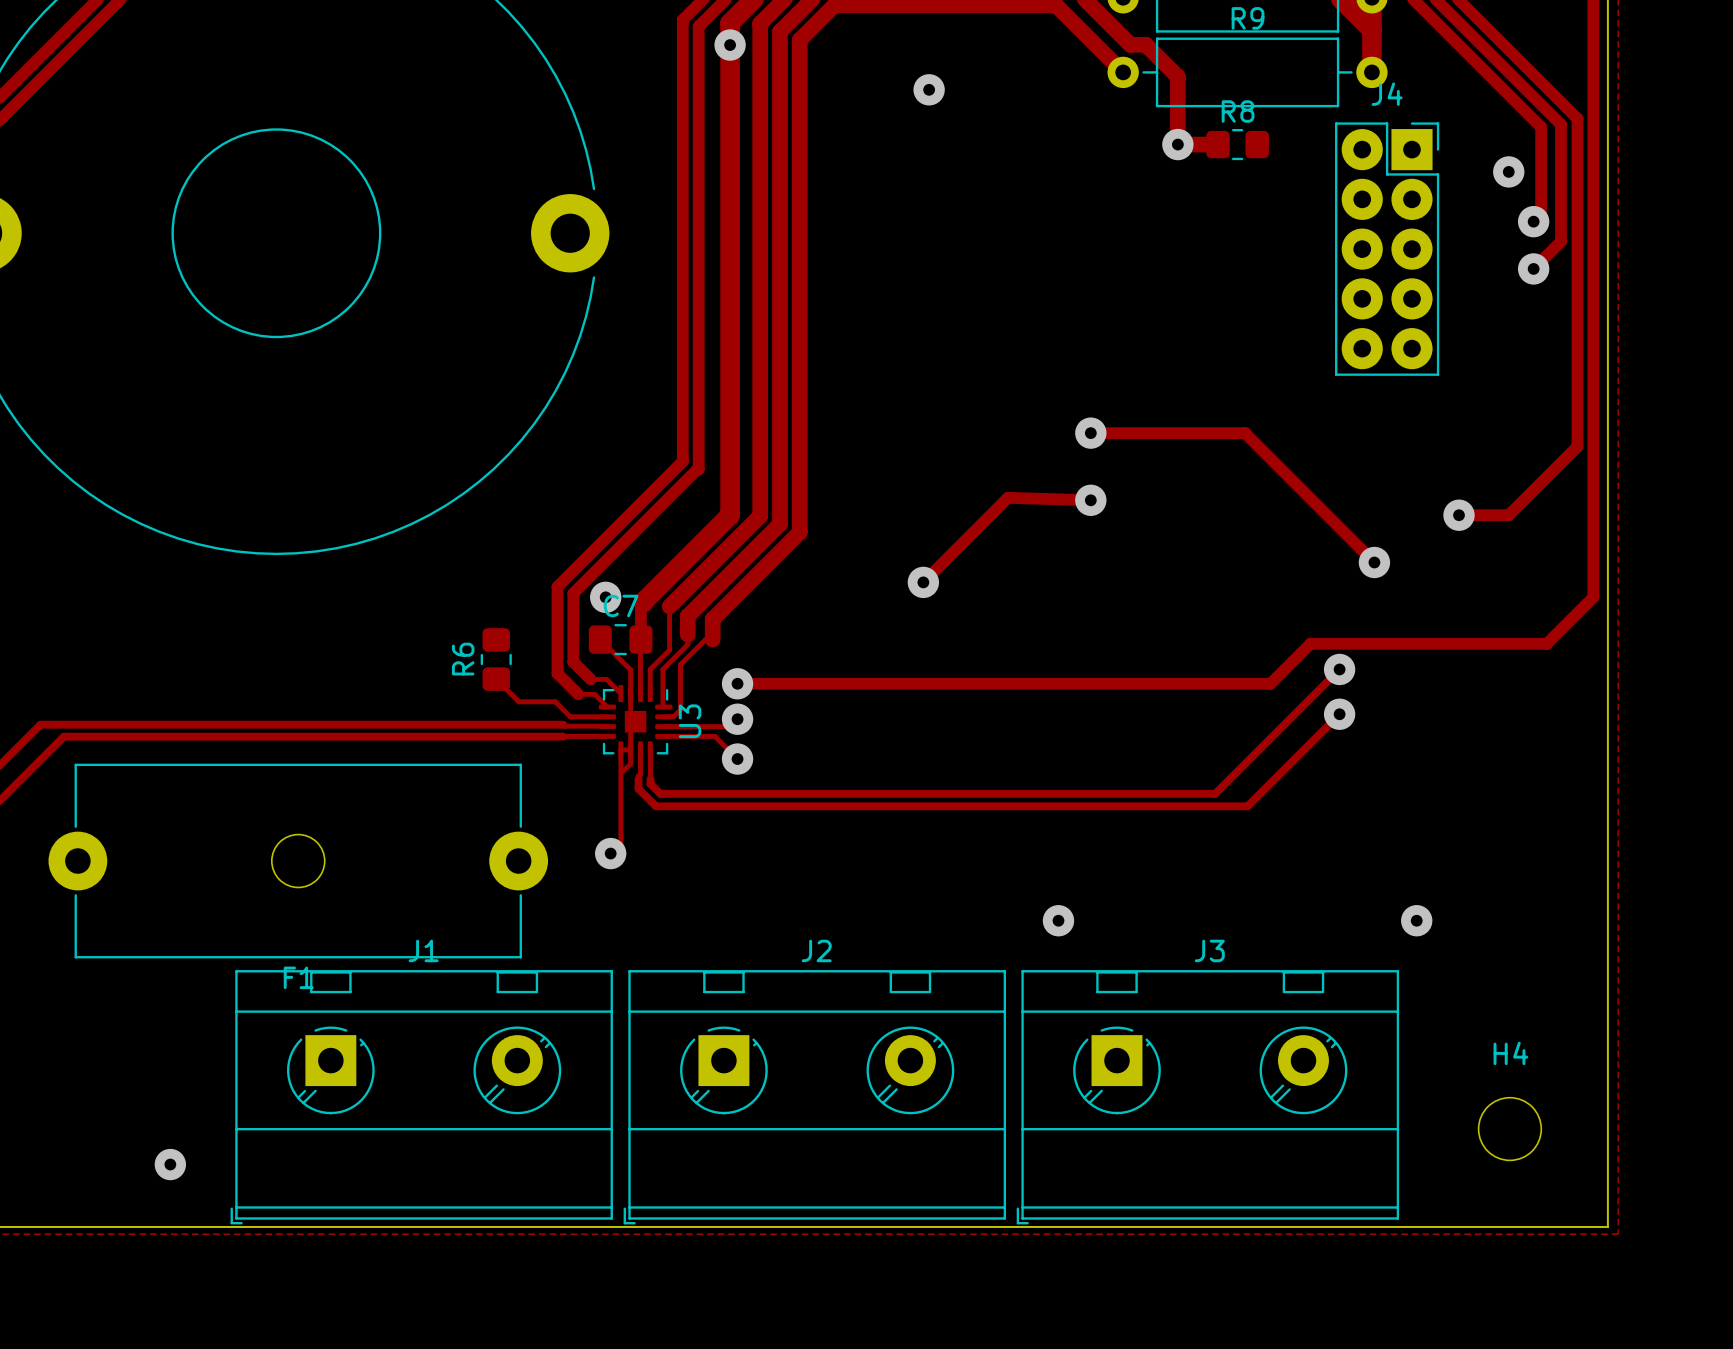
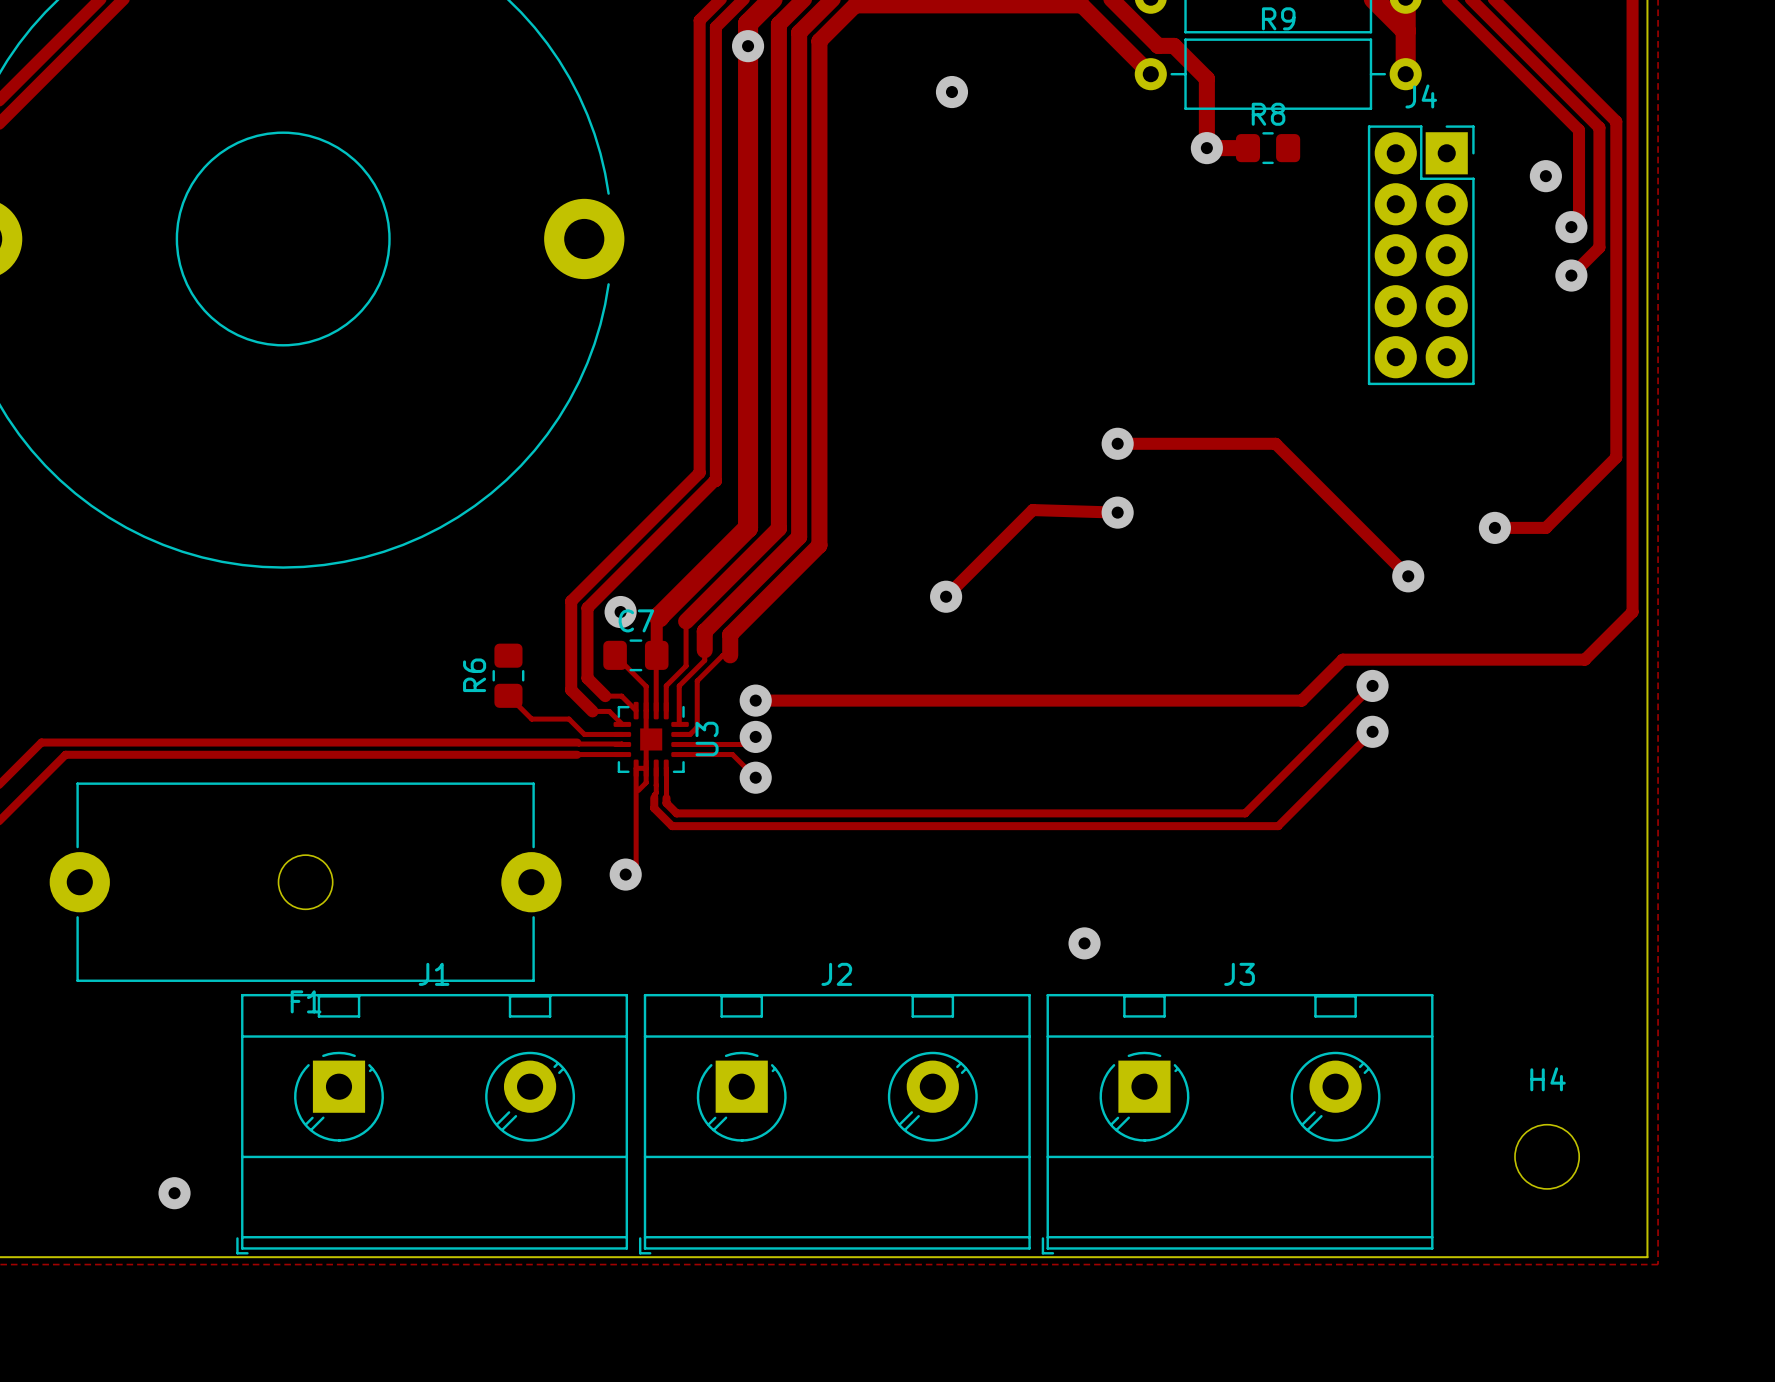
via: (1416, 920) -> none

